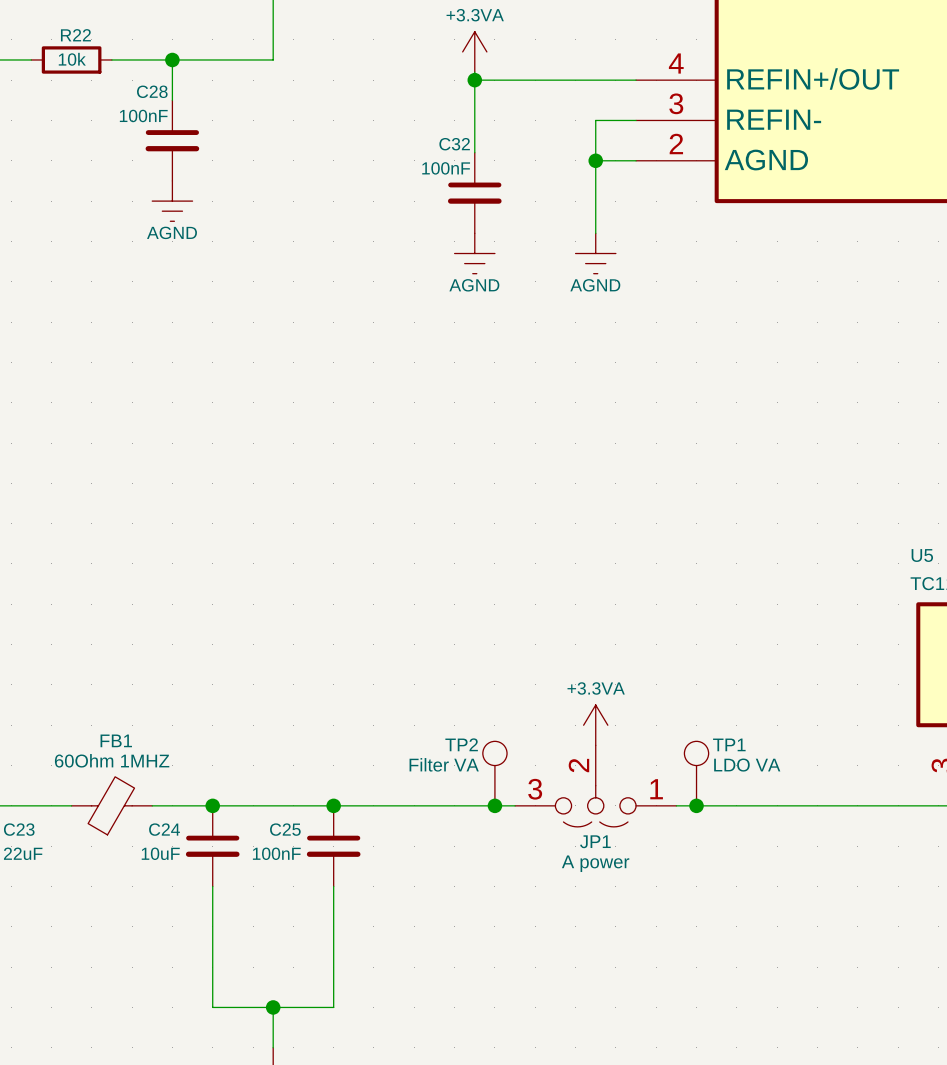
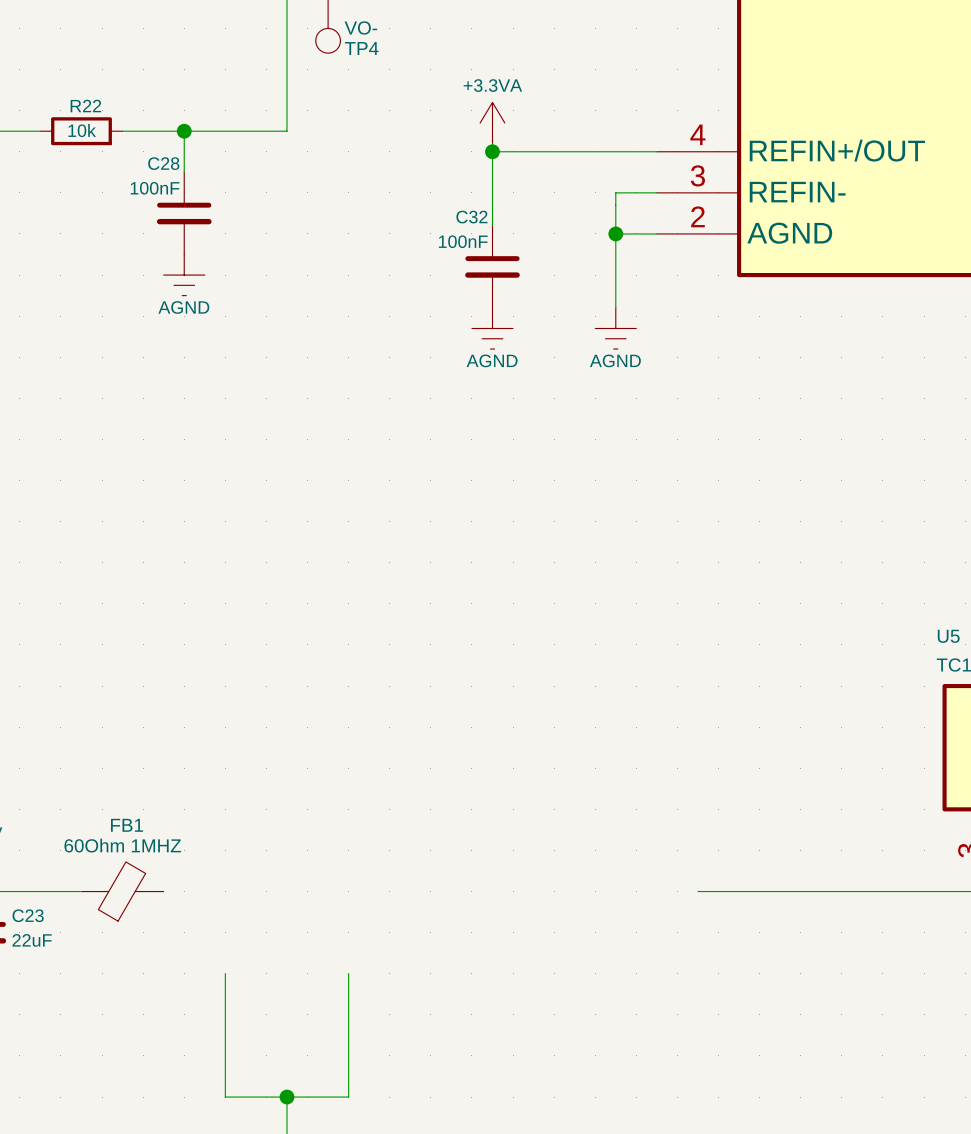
power symbol: +3.3VA (595, 725) -> none
TP2: Filter VA (494, 773) -> none
TP1: LDO VA (696, 773) -> none
JP1: A power (595, 786) -> none
wire: (152, 805) (515, 805) -> none
junction: (212, 805) -> none
junction: (333, 805) -> none
junction: (494, 805) -> none
junction: (696, 805) -> none
C24: 10uF (212, 846) -> none
C25: 100nF (333, 846) -> none

